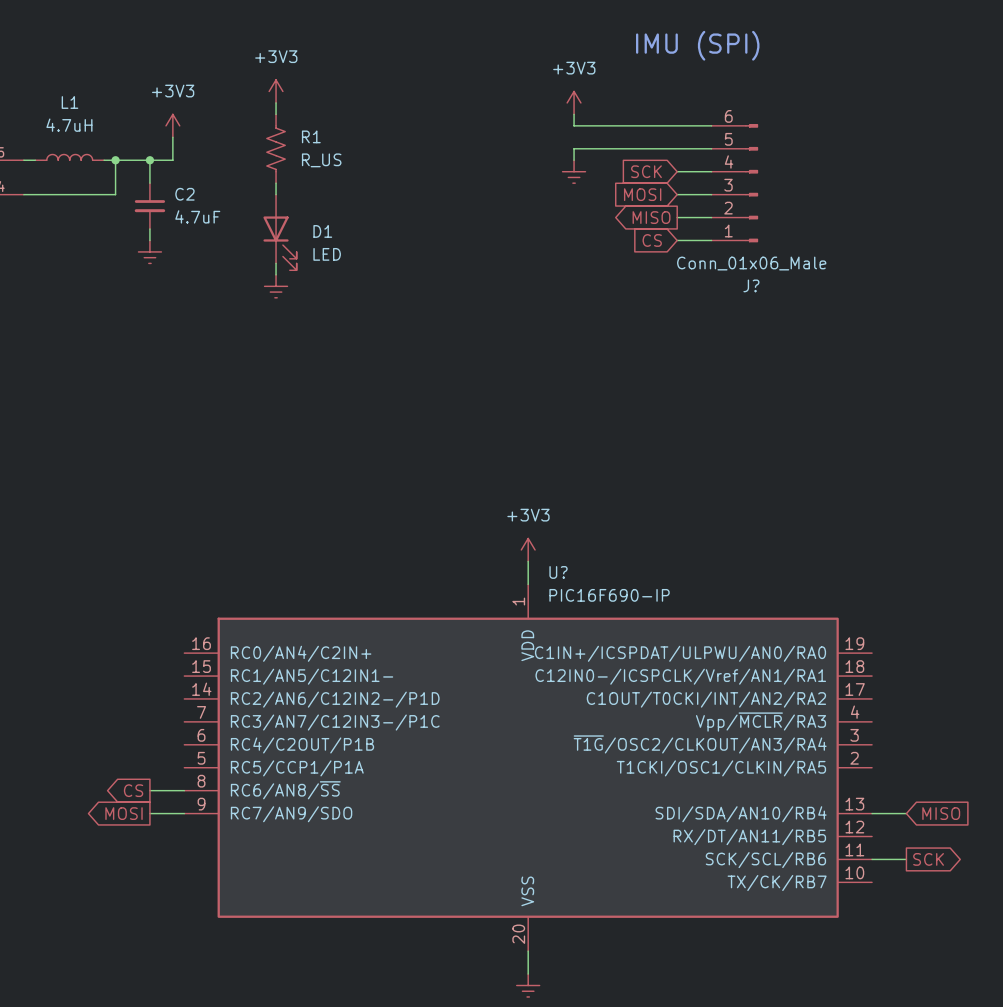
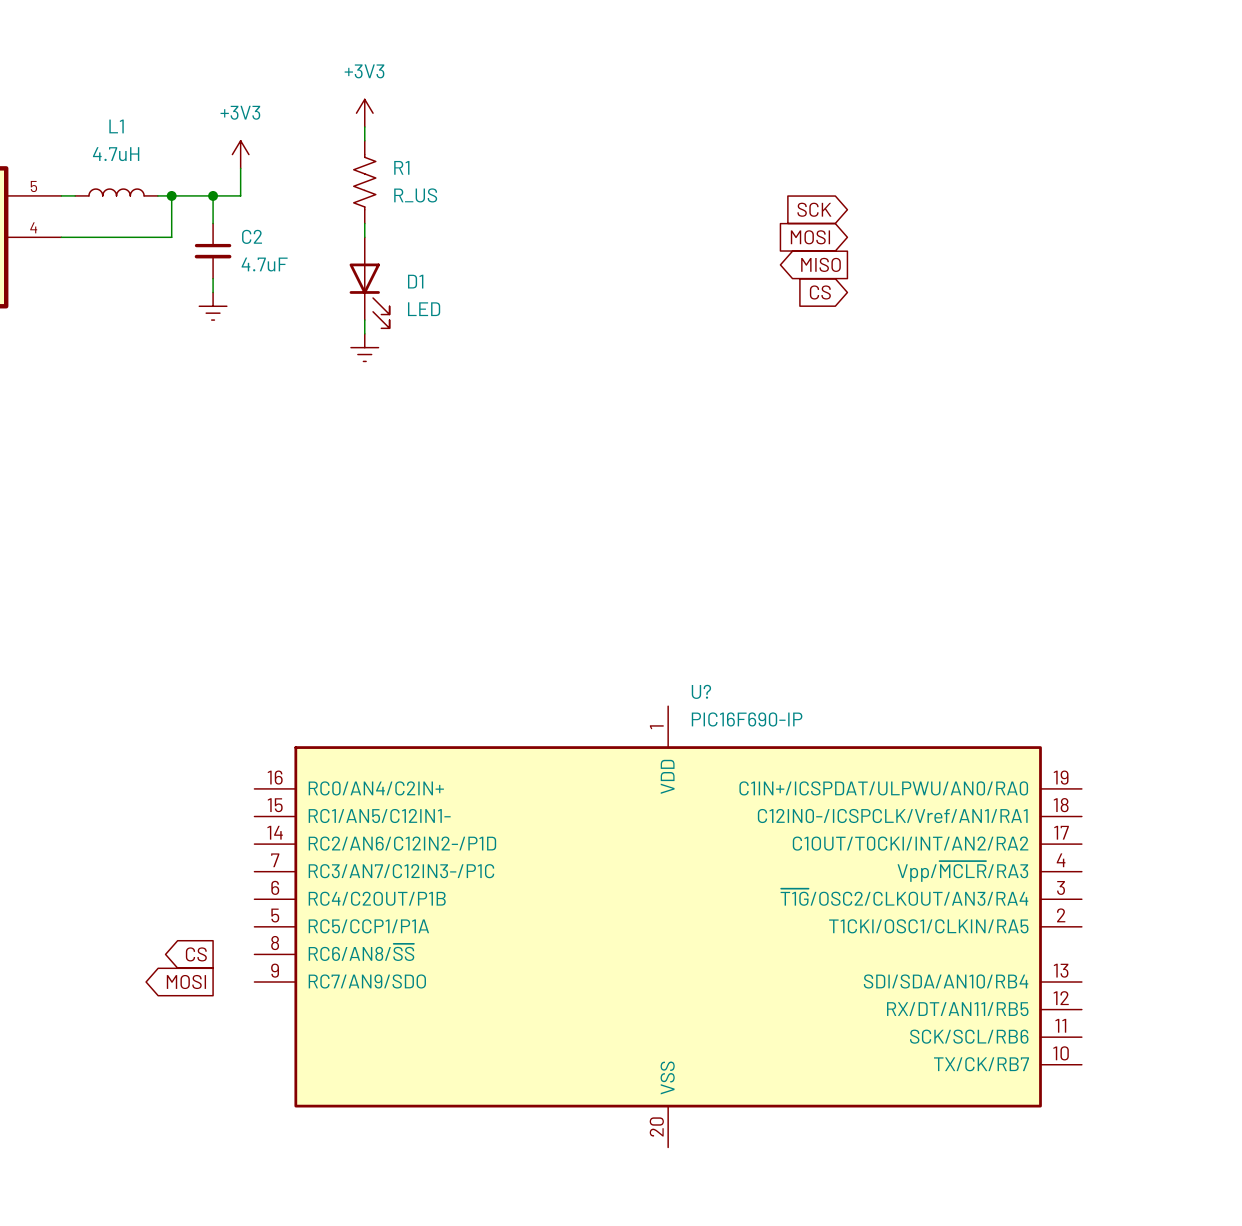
text: IMU (SPI) (697, 45) -> none
power symbol: +3V3 (574, 102) -> none
wire: (574, 114) (574, 125) (711, 125) -> none
wire: (711, 148) (574, 148) (574, 160) -> none
power symbol: (574, 171) -> none
wire: (677, 171) (711, 171) -> none
J?: Conn_01x06_Male (734, 183) -> none
wire: (677, 194) (711, 194) -> none
wire: (677, 217) (711, 217) -> none
wire: (677, 240) (711, 240) -> none
power symbol: +3V3 (528, 549) -> none
wire: (528, 561) (528, 584) -> none
wire: (149, 790) (184, 790) -> none
wire: (149, 813) (184, 813) -> none
wire: (872, 813) (906, 813) -> none
global label: MISO (941, 813) -> none
wire: (872, 859) (906, 859) -> none
global label: SCK (928, 859) -> none
wire: (528, 951) (528, 974) -> none
power symbol: (528, 985) -> none

